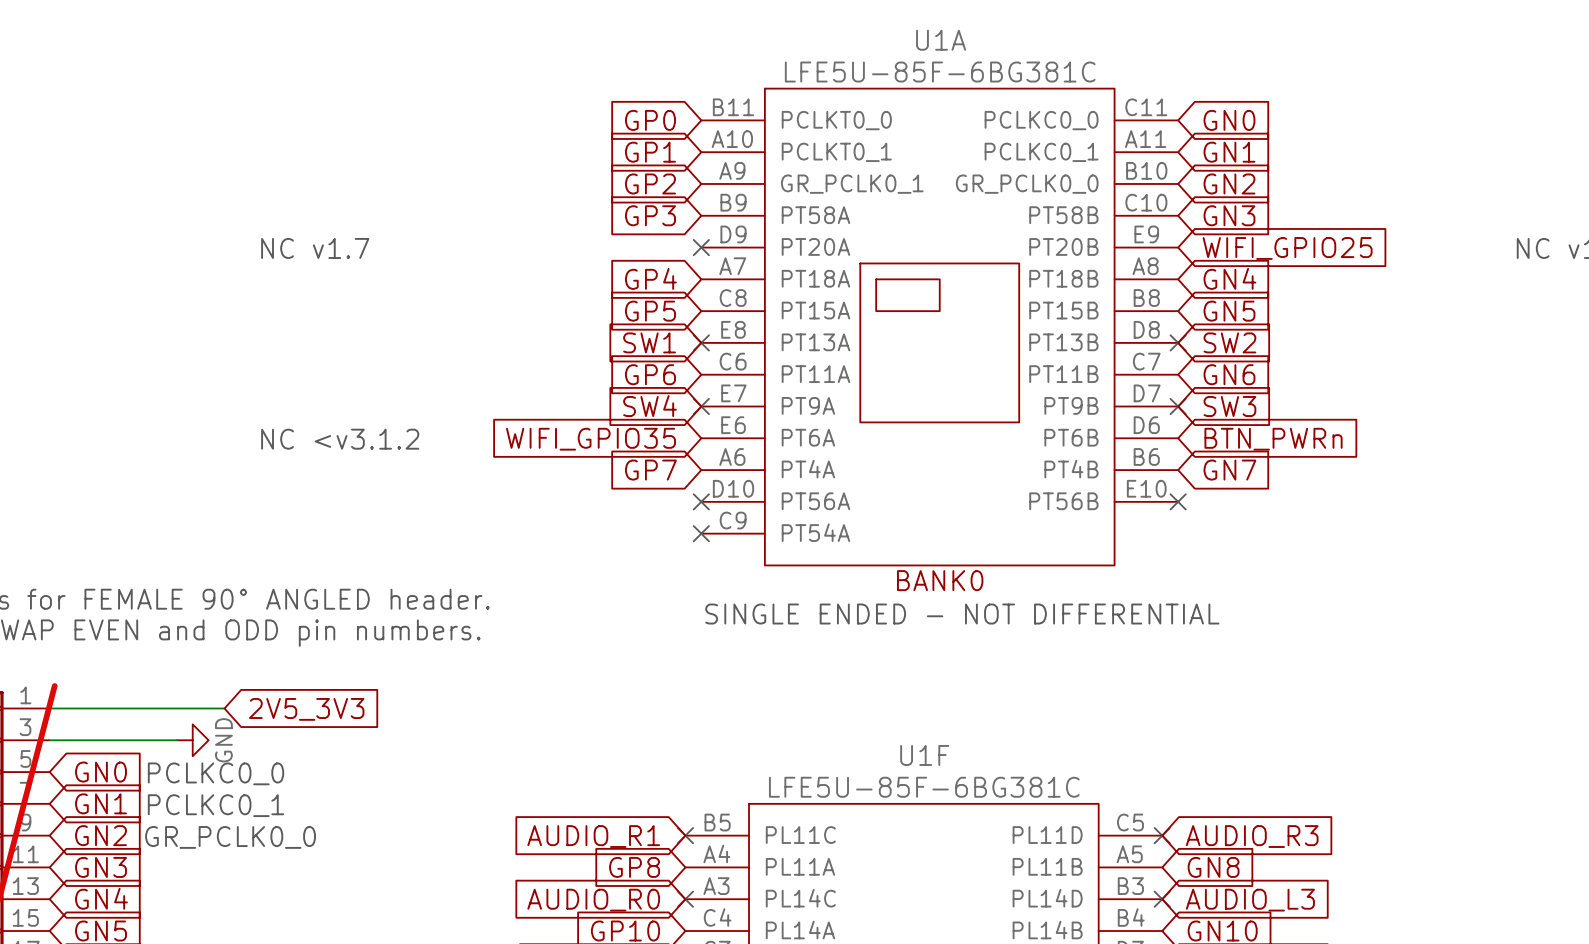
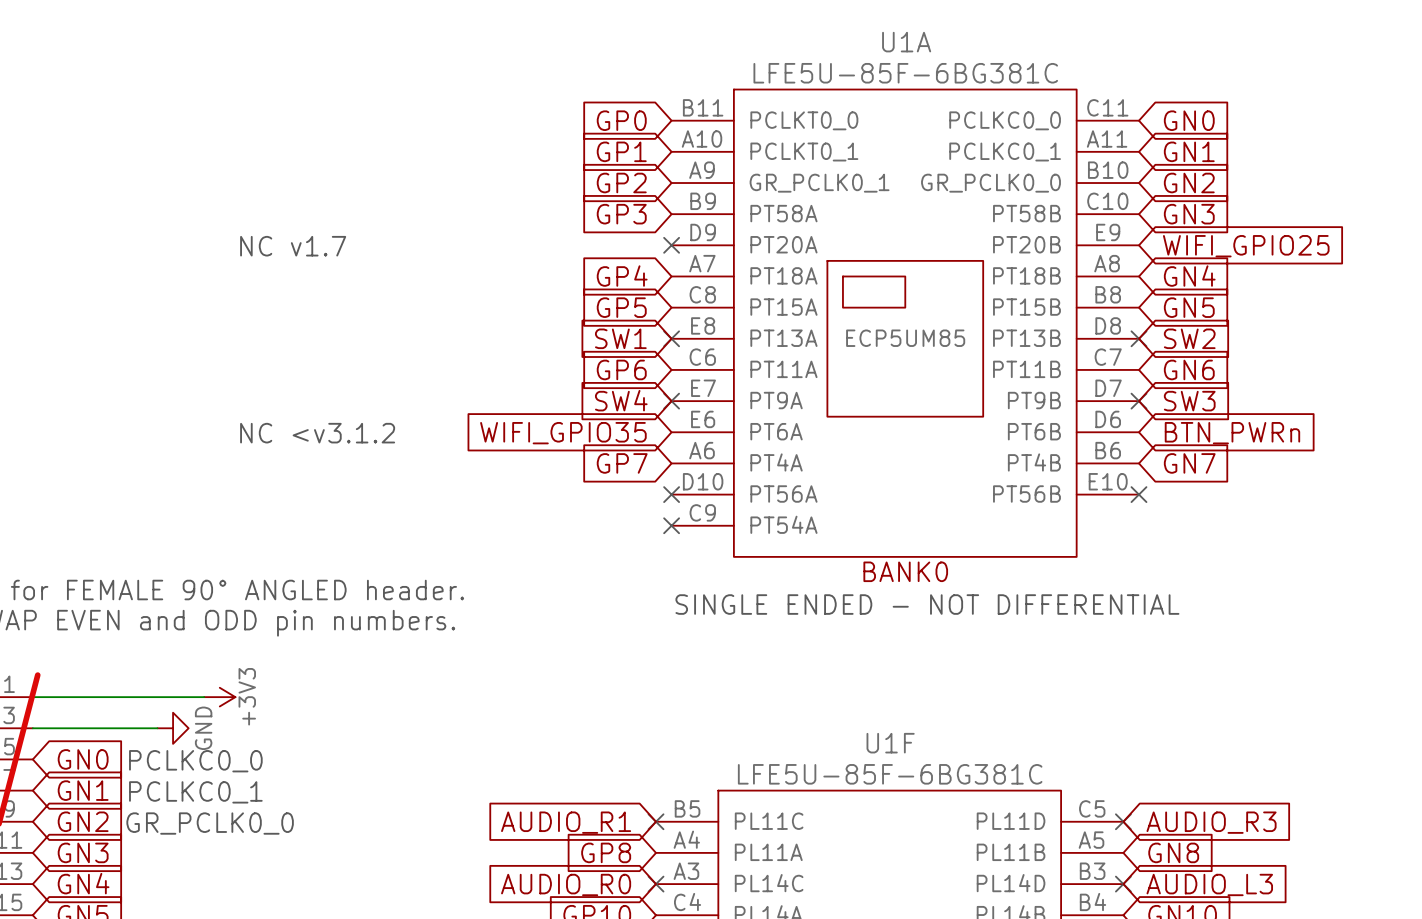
U1A text: none -> ECP5UM85 (905, 338)
power symbol: none -> +3V3 (219, 697)
global label: 2V5_3V3 (306, 709) -> none

